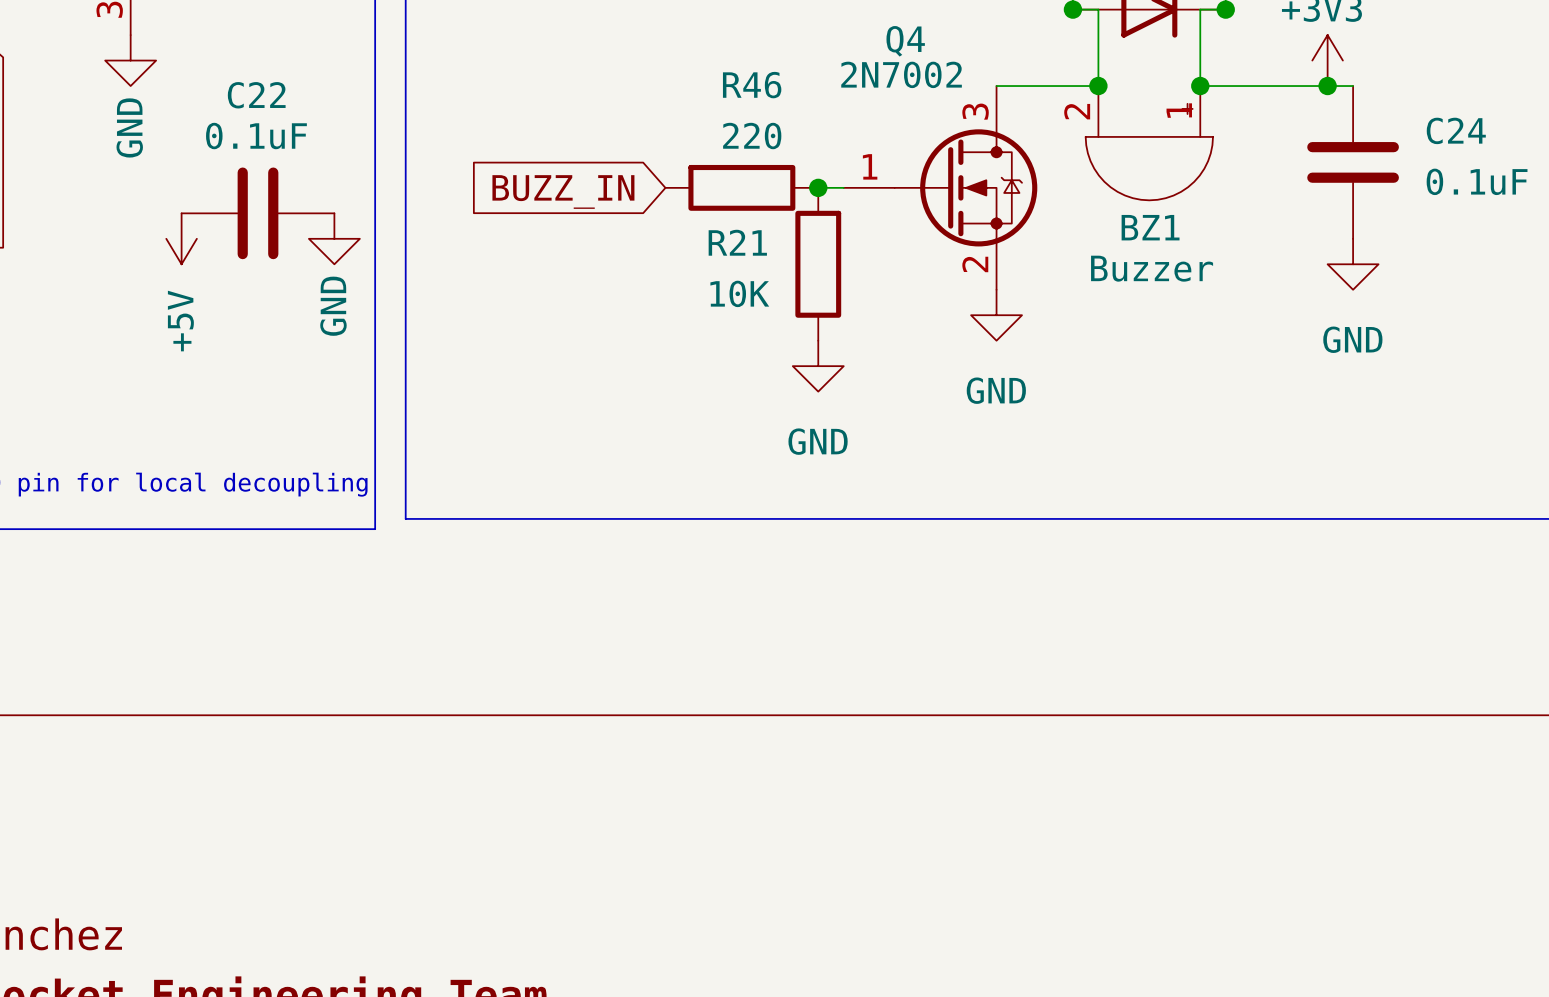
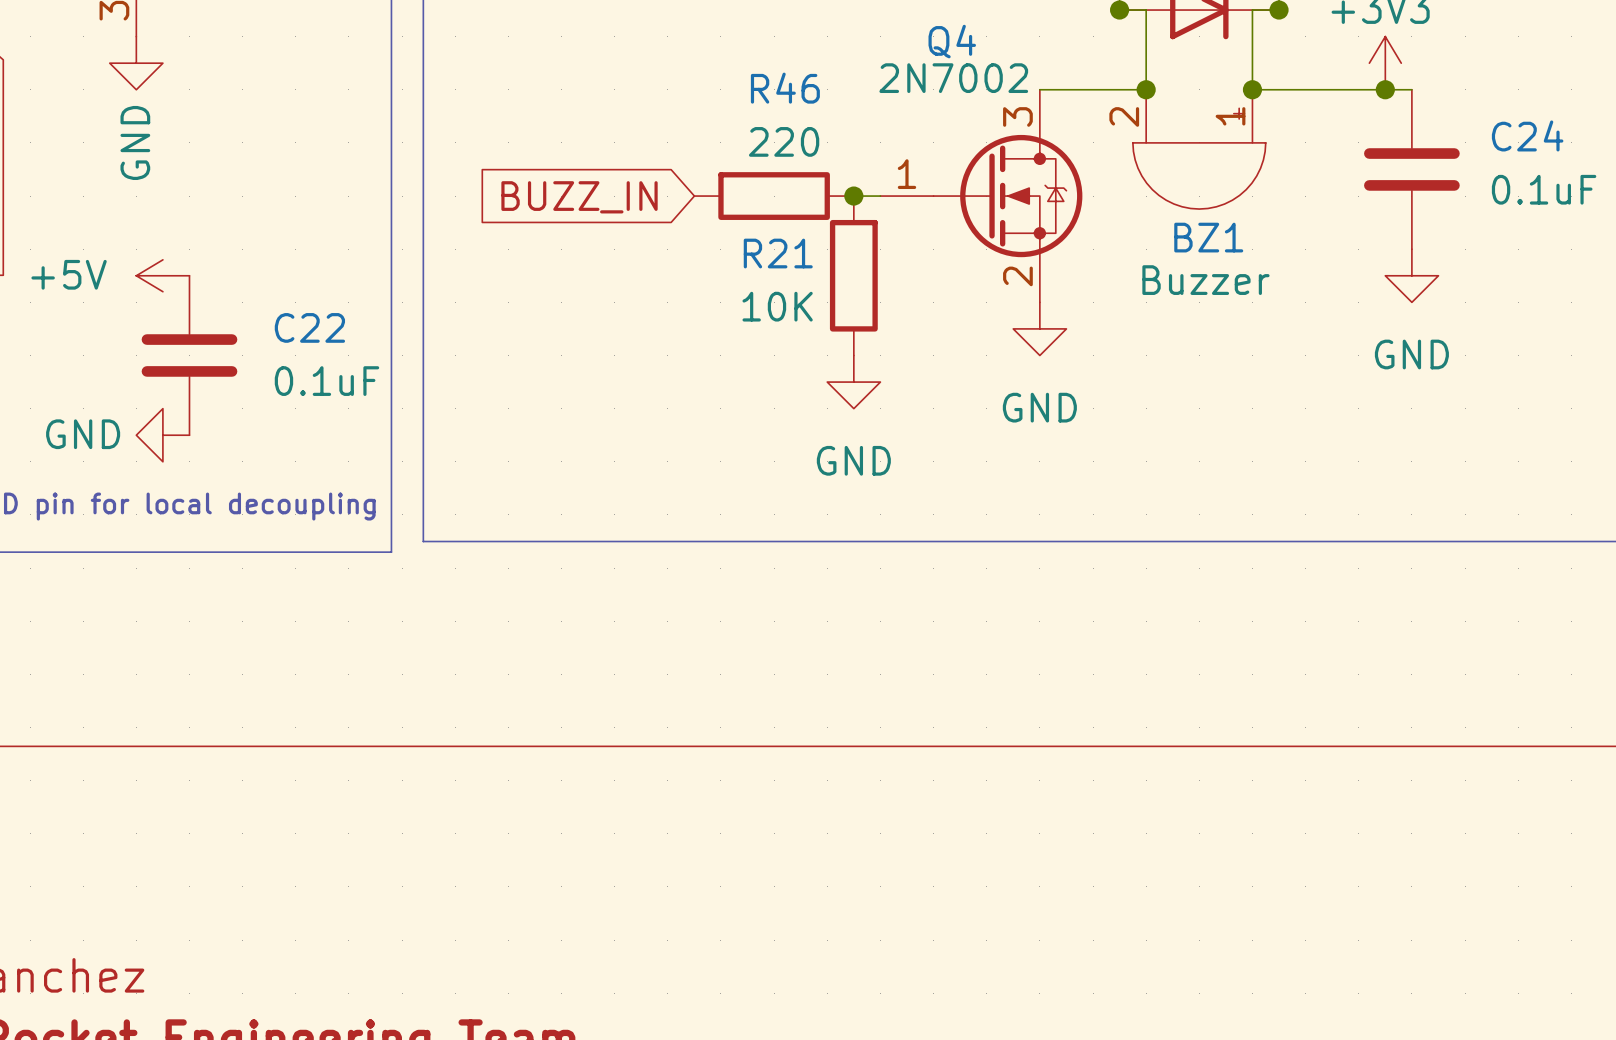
C22 value position: 0.1uF (256, 136) -> 0.1uF (326, 381)
C22 rotation: 0° (257, 213) -> 90° clockwise (189, 355)
C22 position: (257, 213) -> (189, 355)
power symbol rotation: 0° (181, 238) -> 90° clockwise (162, 275)
power symbol position: +5V (181, 238) -> +5V (162, 275)
power symbol rotation: 0° (334, 238) -> 90° clockwise (162, 435)
power symbol position: GND (334, 238) -> GND (162, 435)

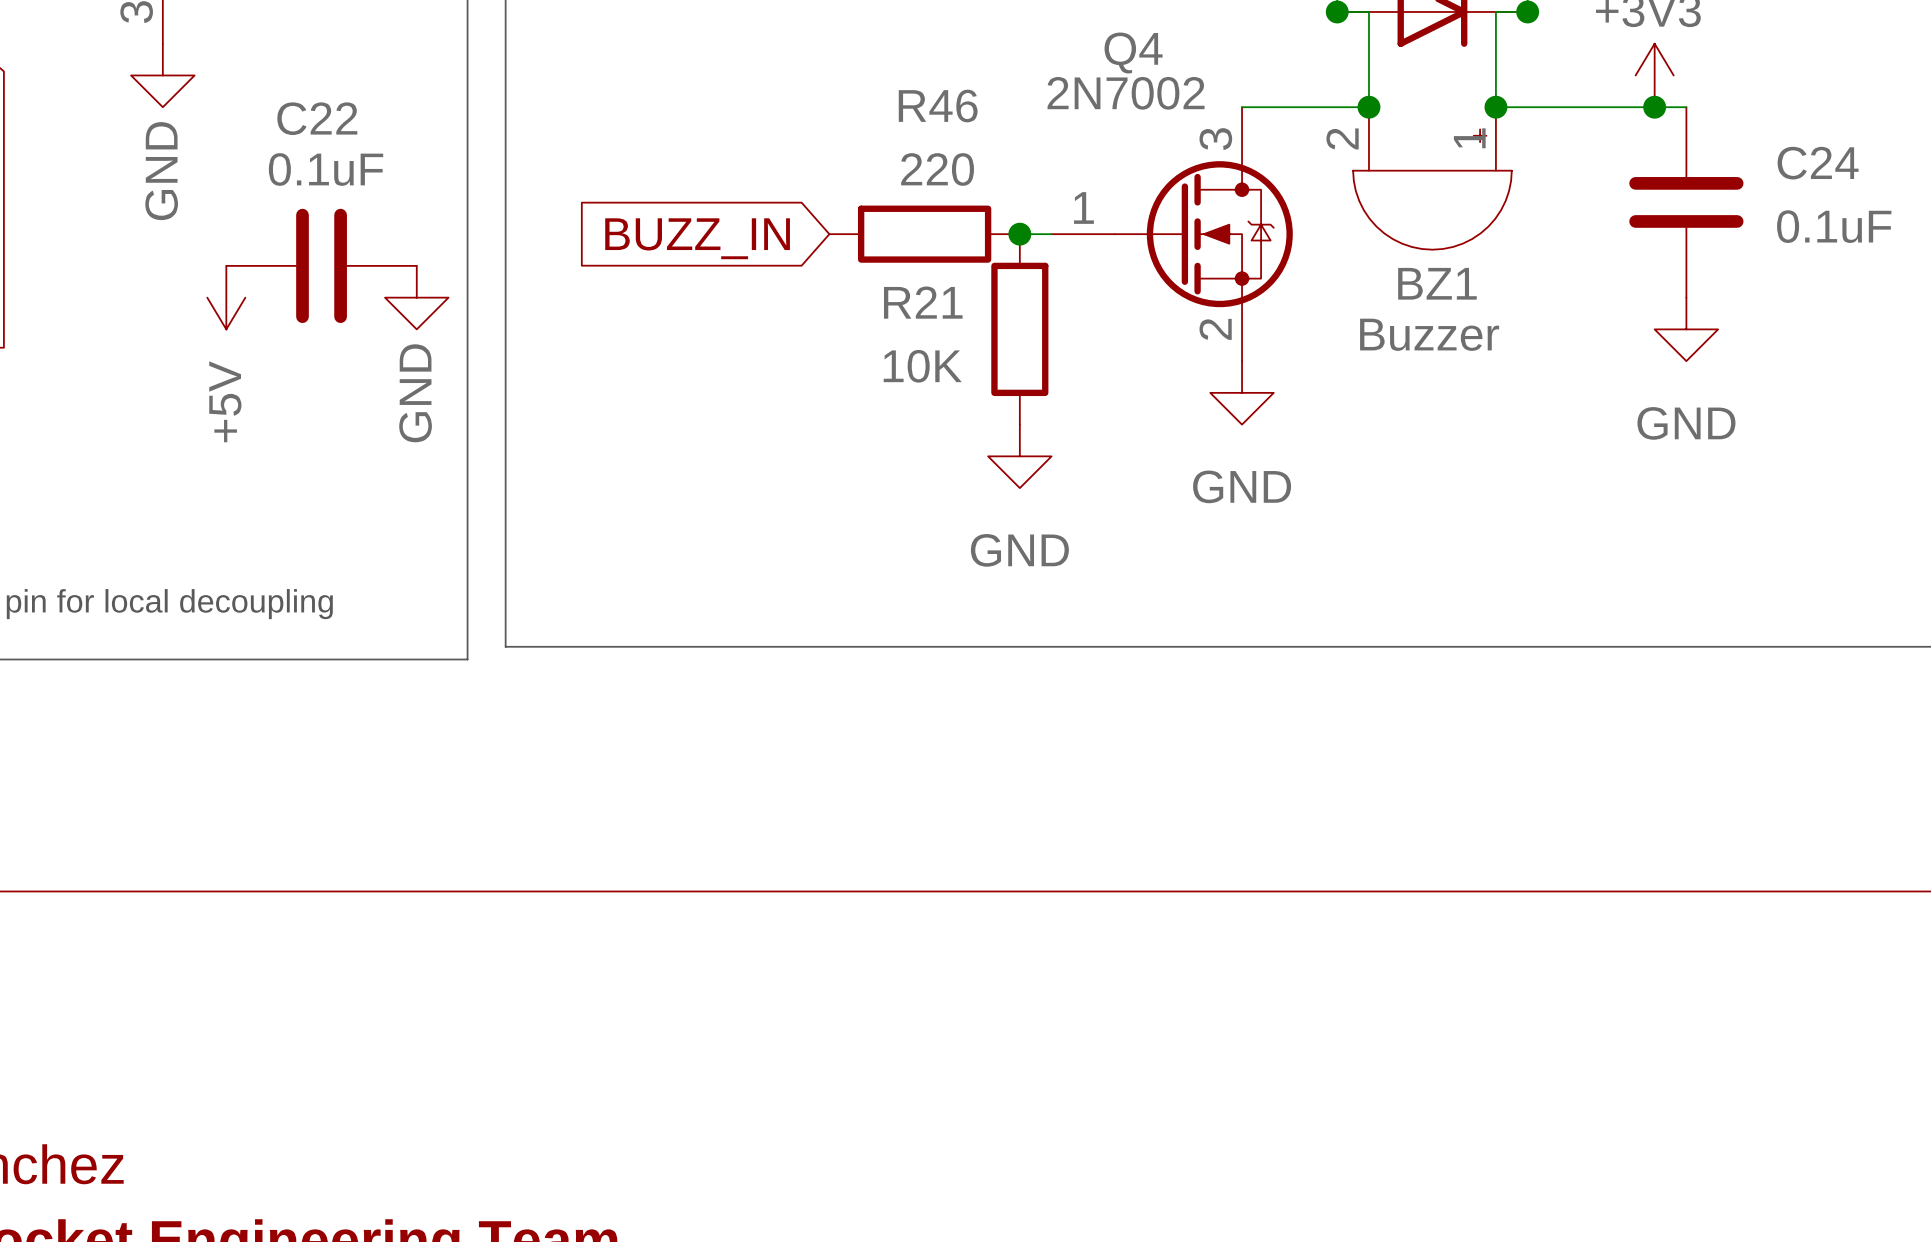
power symbol rotation: 0° (162, 275) -> 90° counterclockwise (226, 297)
power symbol position: +5V (162, 275) -> +5V (226, 297)
C22 name position: C22 (309, 327) -> C22 (317, 118)
C22 rotation: 0° (189, 355) -> 90° clockwise (321, 265)
C22 position: (189, 355) -> (321, 265)
C22 value position: 0.1uF (326, 381) -> 0.1uF (326, 169)
power symbol rotation: 0° (162, 435) -> 90° counterclockwise (416, 297)
power symbol position: GND (162, 435) -> GND (416, 297)

